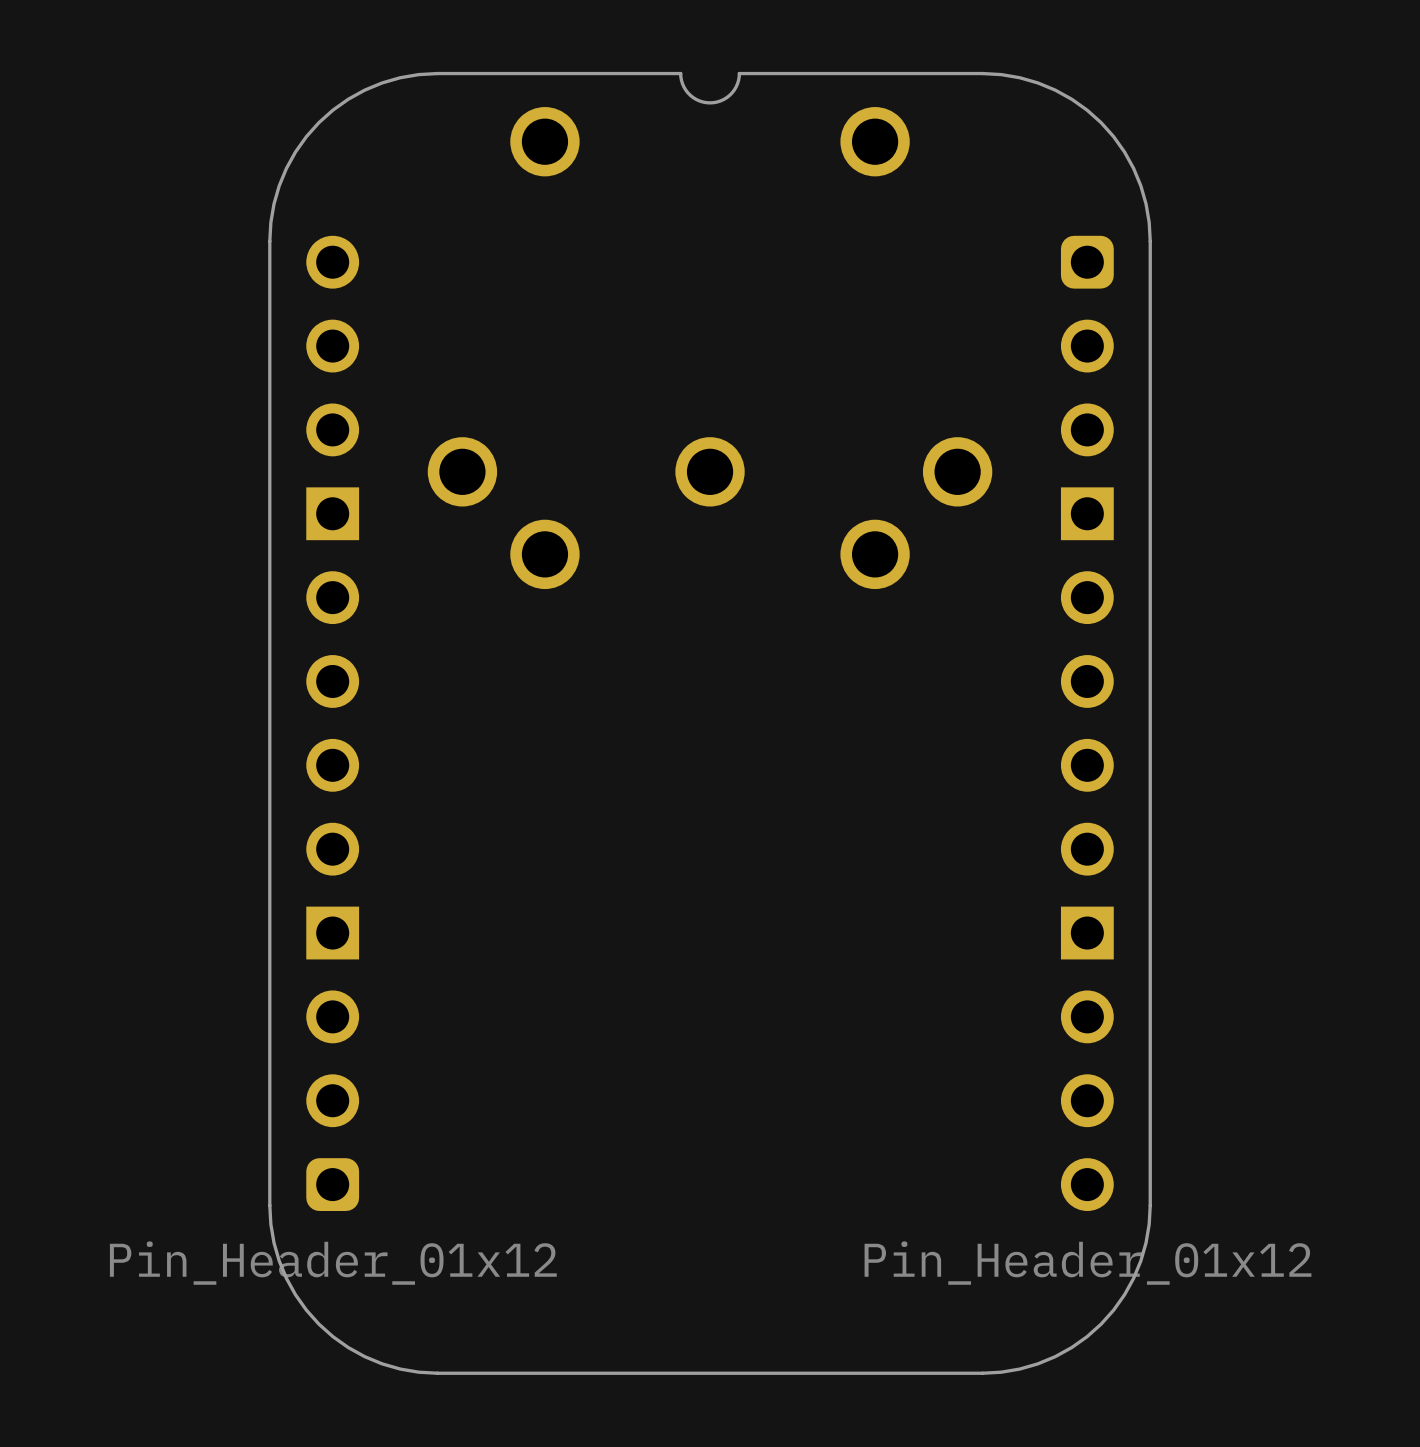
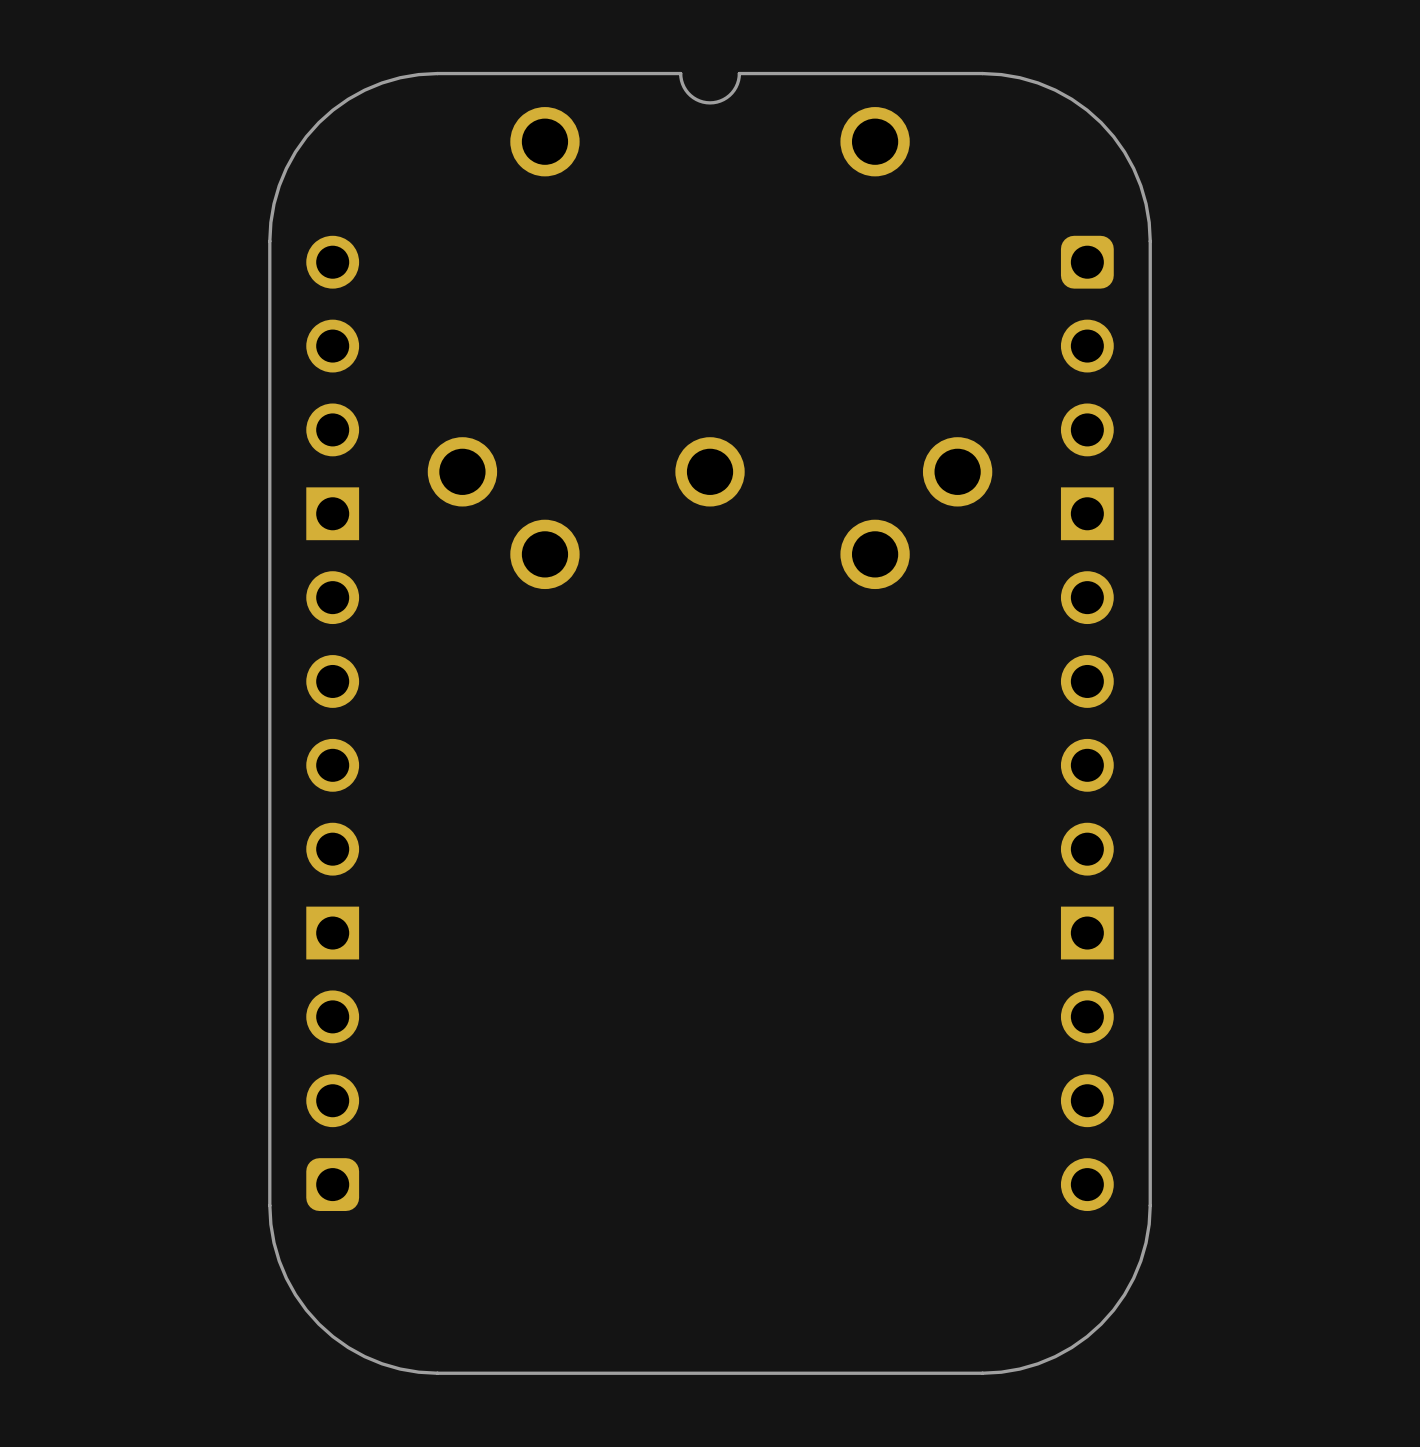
drawing: [109, 1241, 557, 1285] -> none
drawing: [864, 1241, 1312, 1285] -> none

